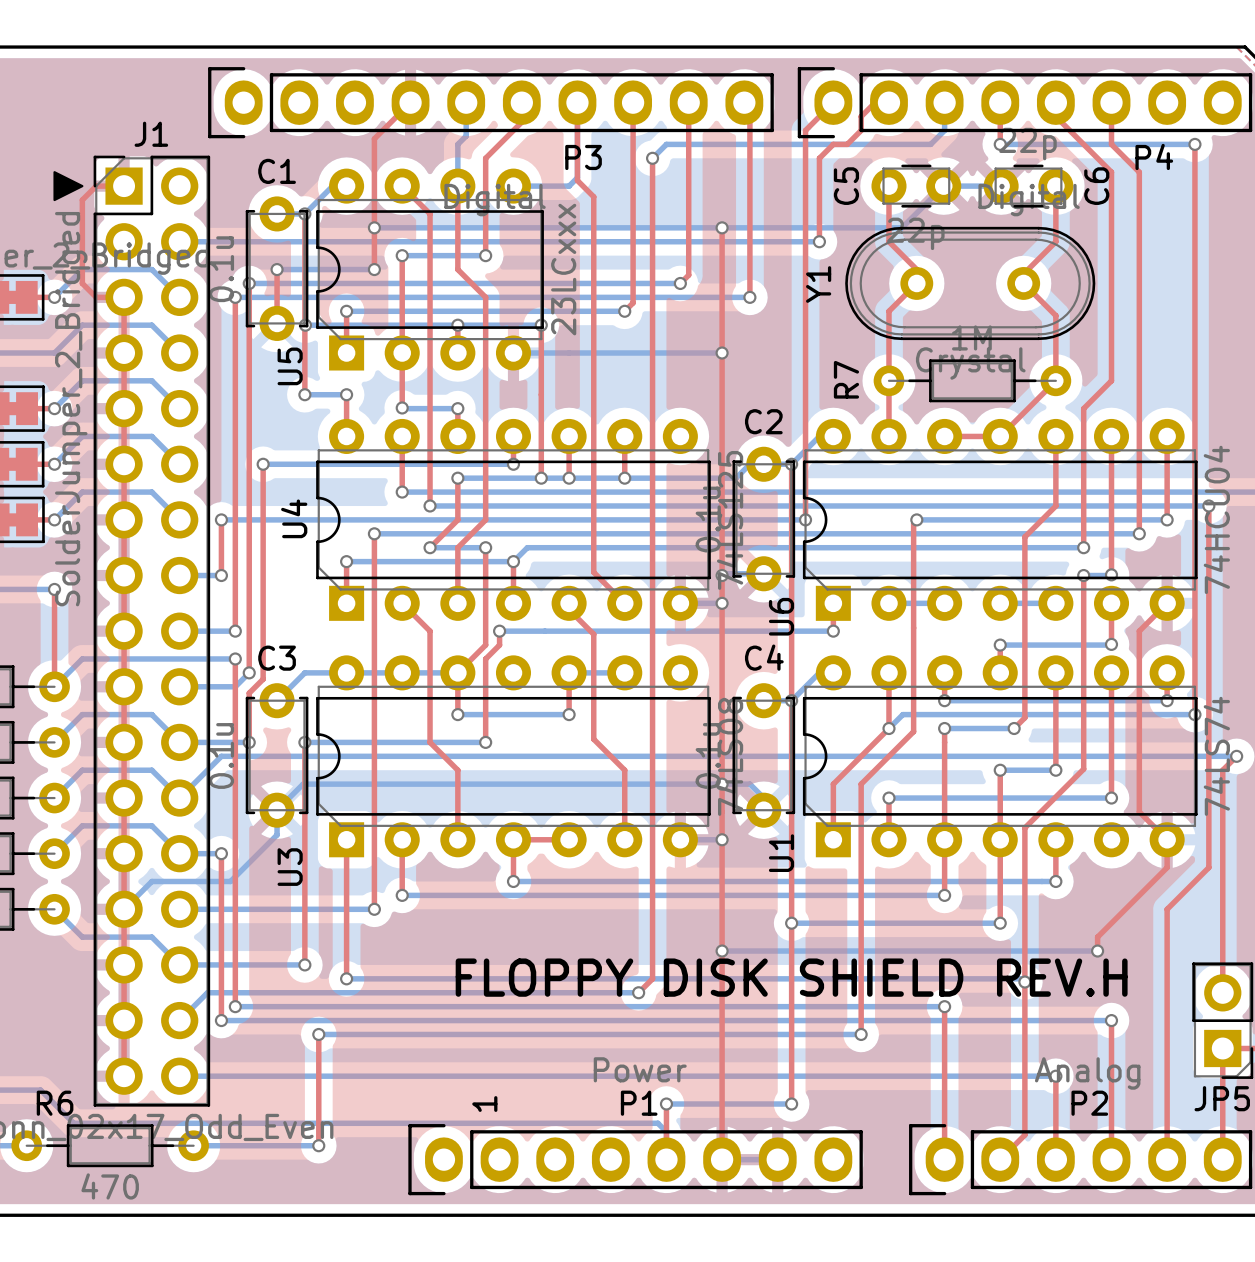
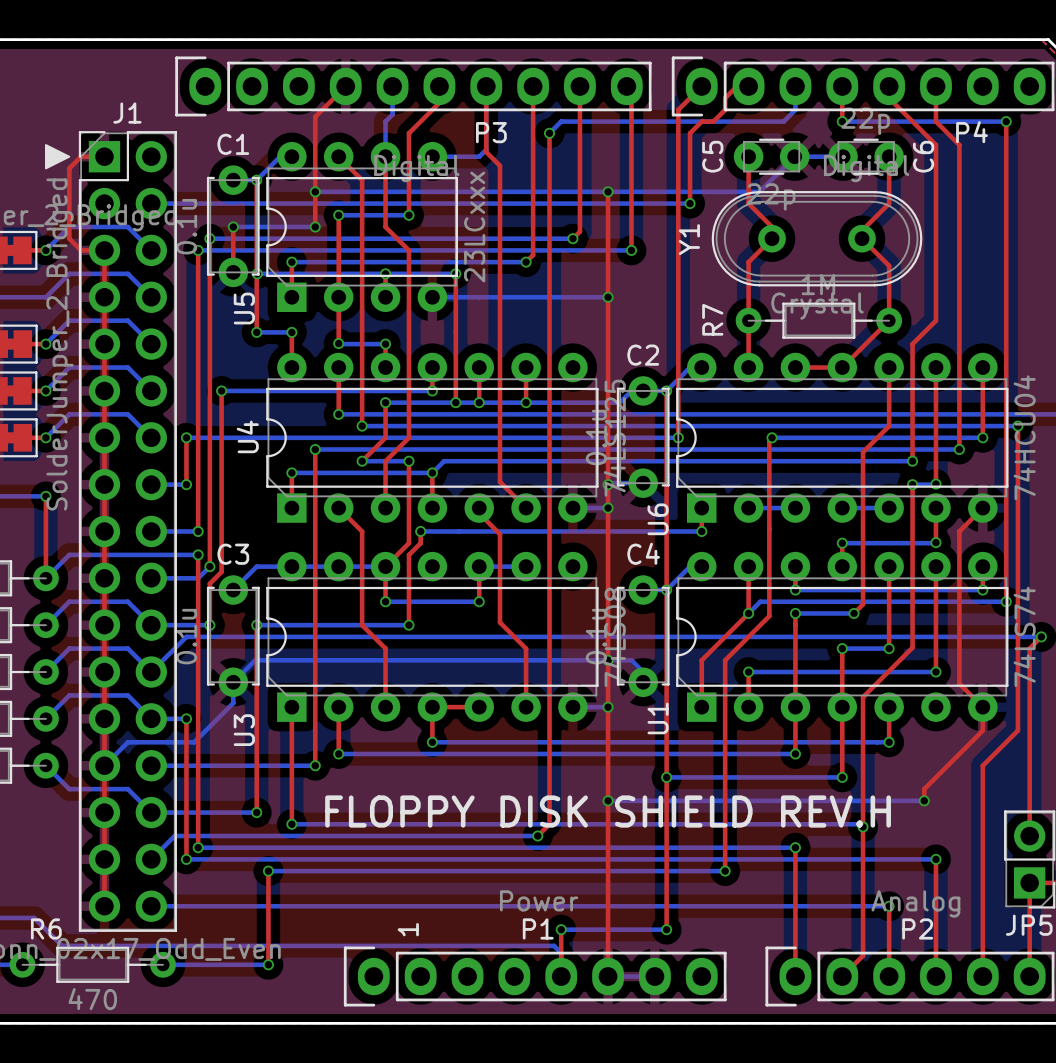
text position: FLOPPY DISK SHIELD REV.H (791, 977) -> FLOPPY DISK SHIELD REV.H (608, 811)

